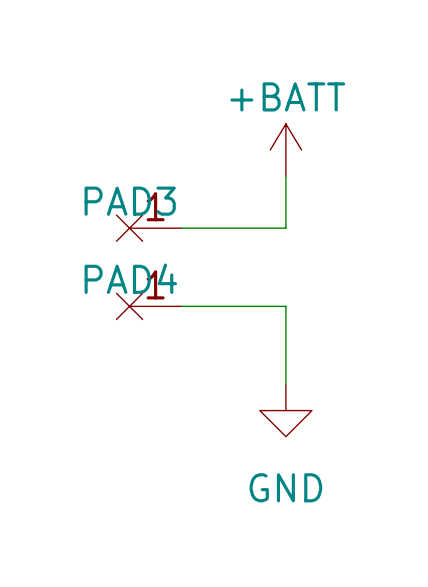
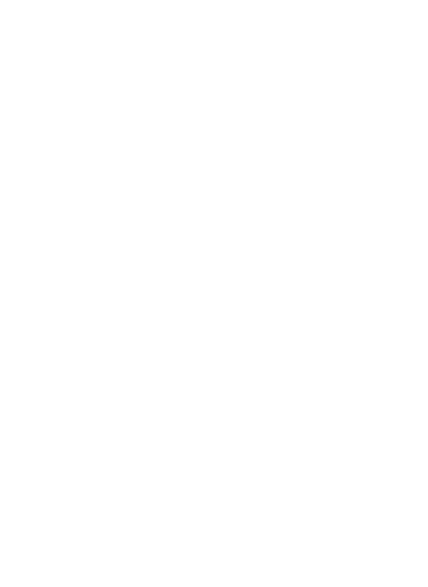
power symbol: +BATT (285, 150) -> none
wire: (285, 176) (285, 228) (181, 228) -> none
PAD3: (149, 228) -> none
PAD4: (149, 306) -> none
wire: (181, 306) (285, 306) (285, 384) -> none
power symbol: GND (285, 410) -> none

